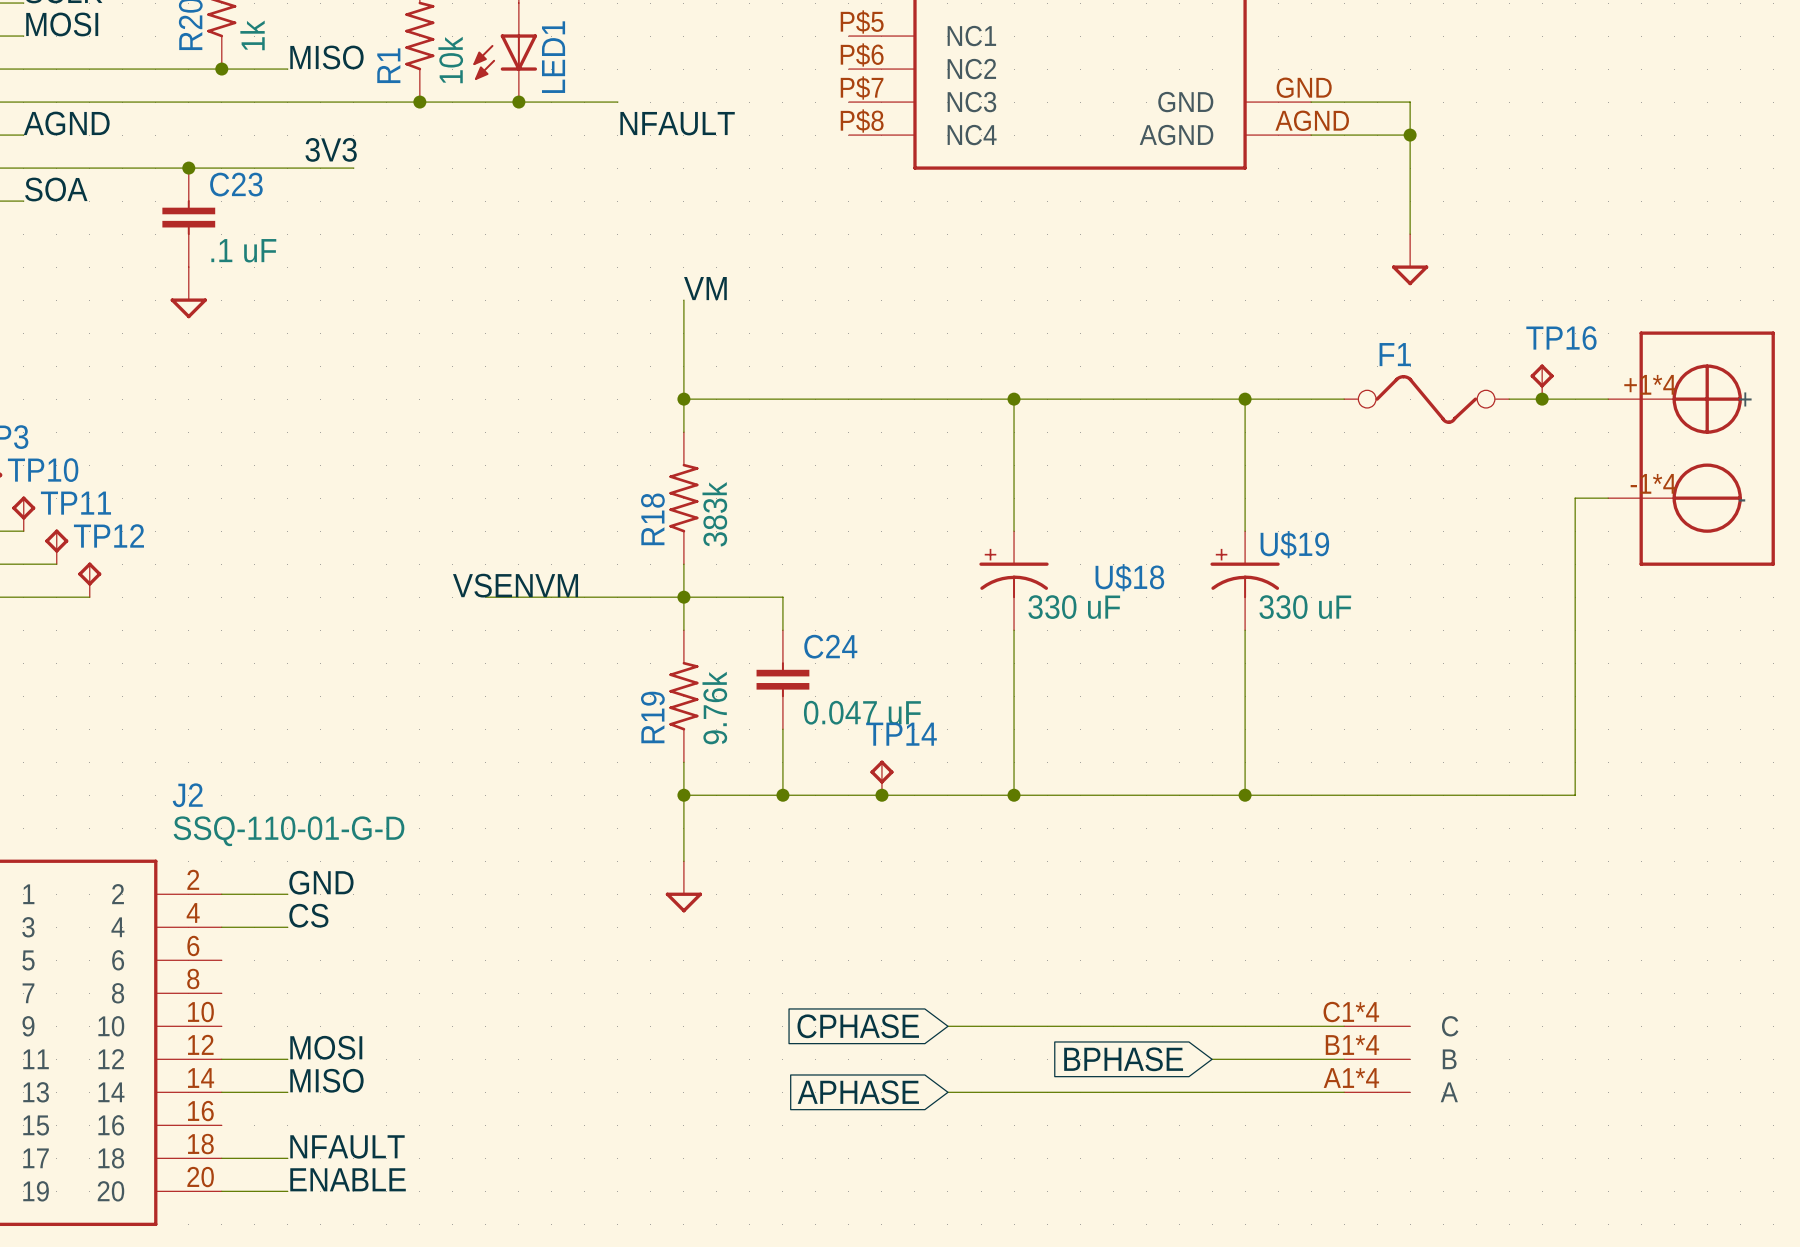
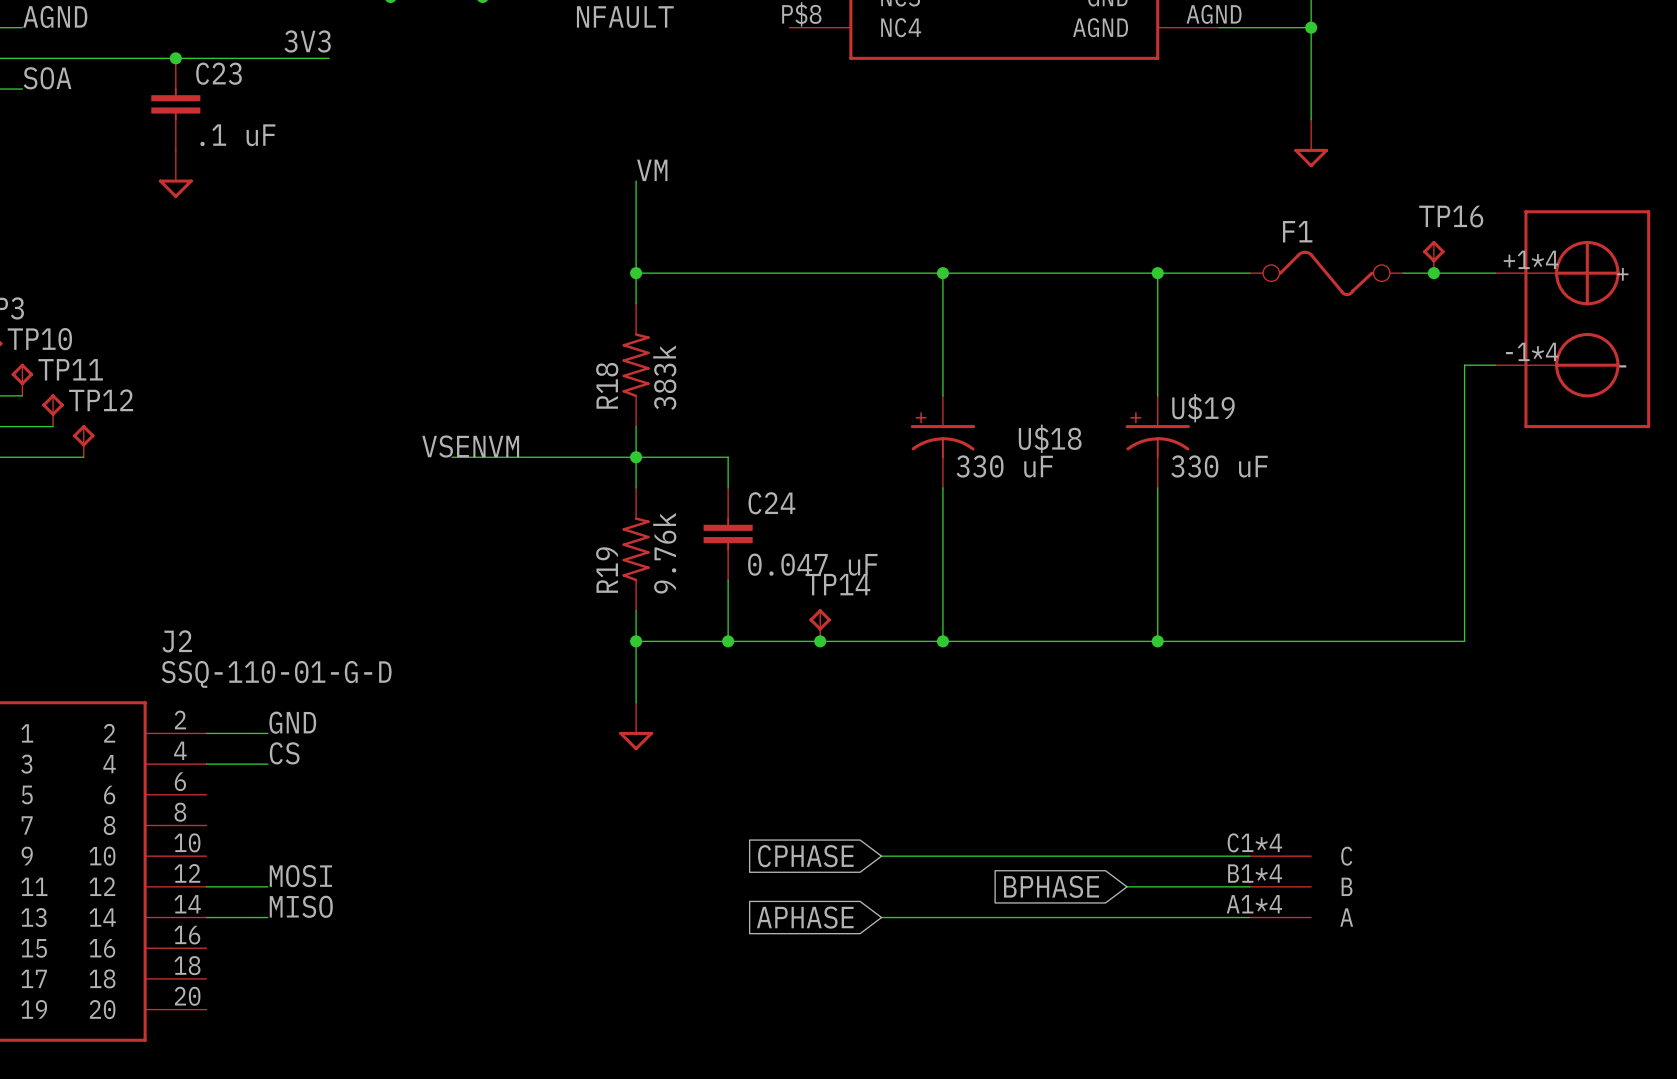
label: NFAULT (347, 1146) -> none
wire: (221, 1158) (287, 1158) -> none
label: ENABLE (348, 1179) -> none
wire: (221, 1191) (287, 1191) -> none

